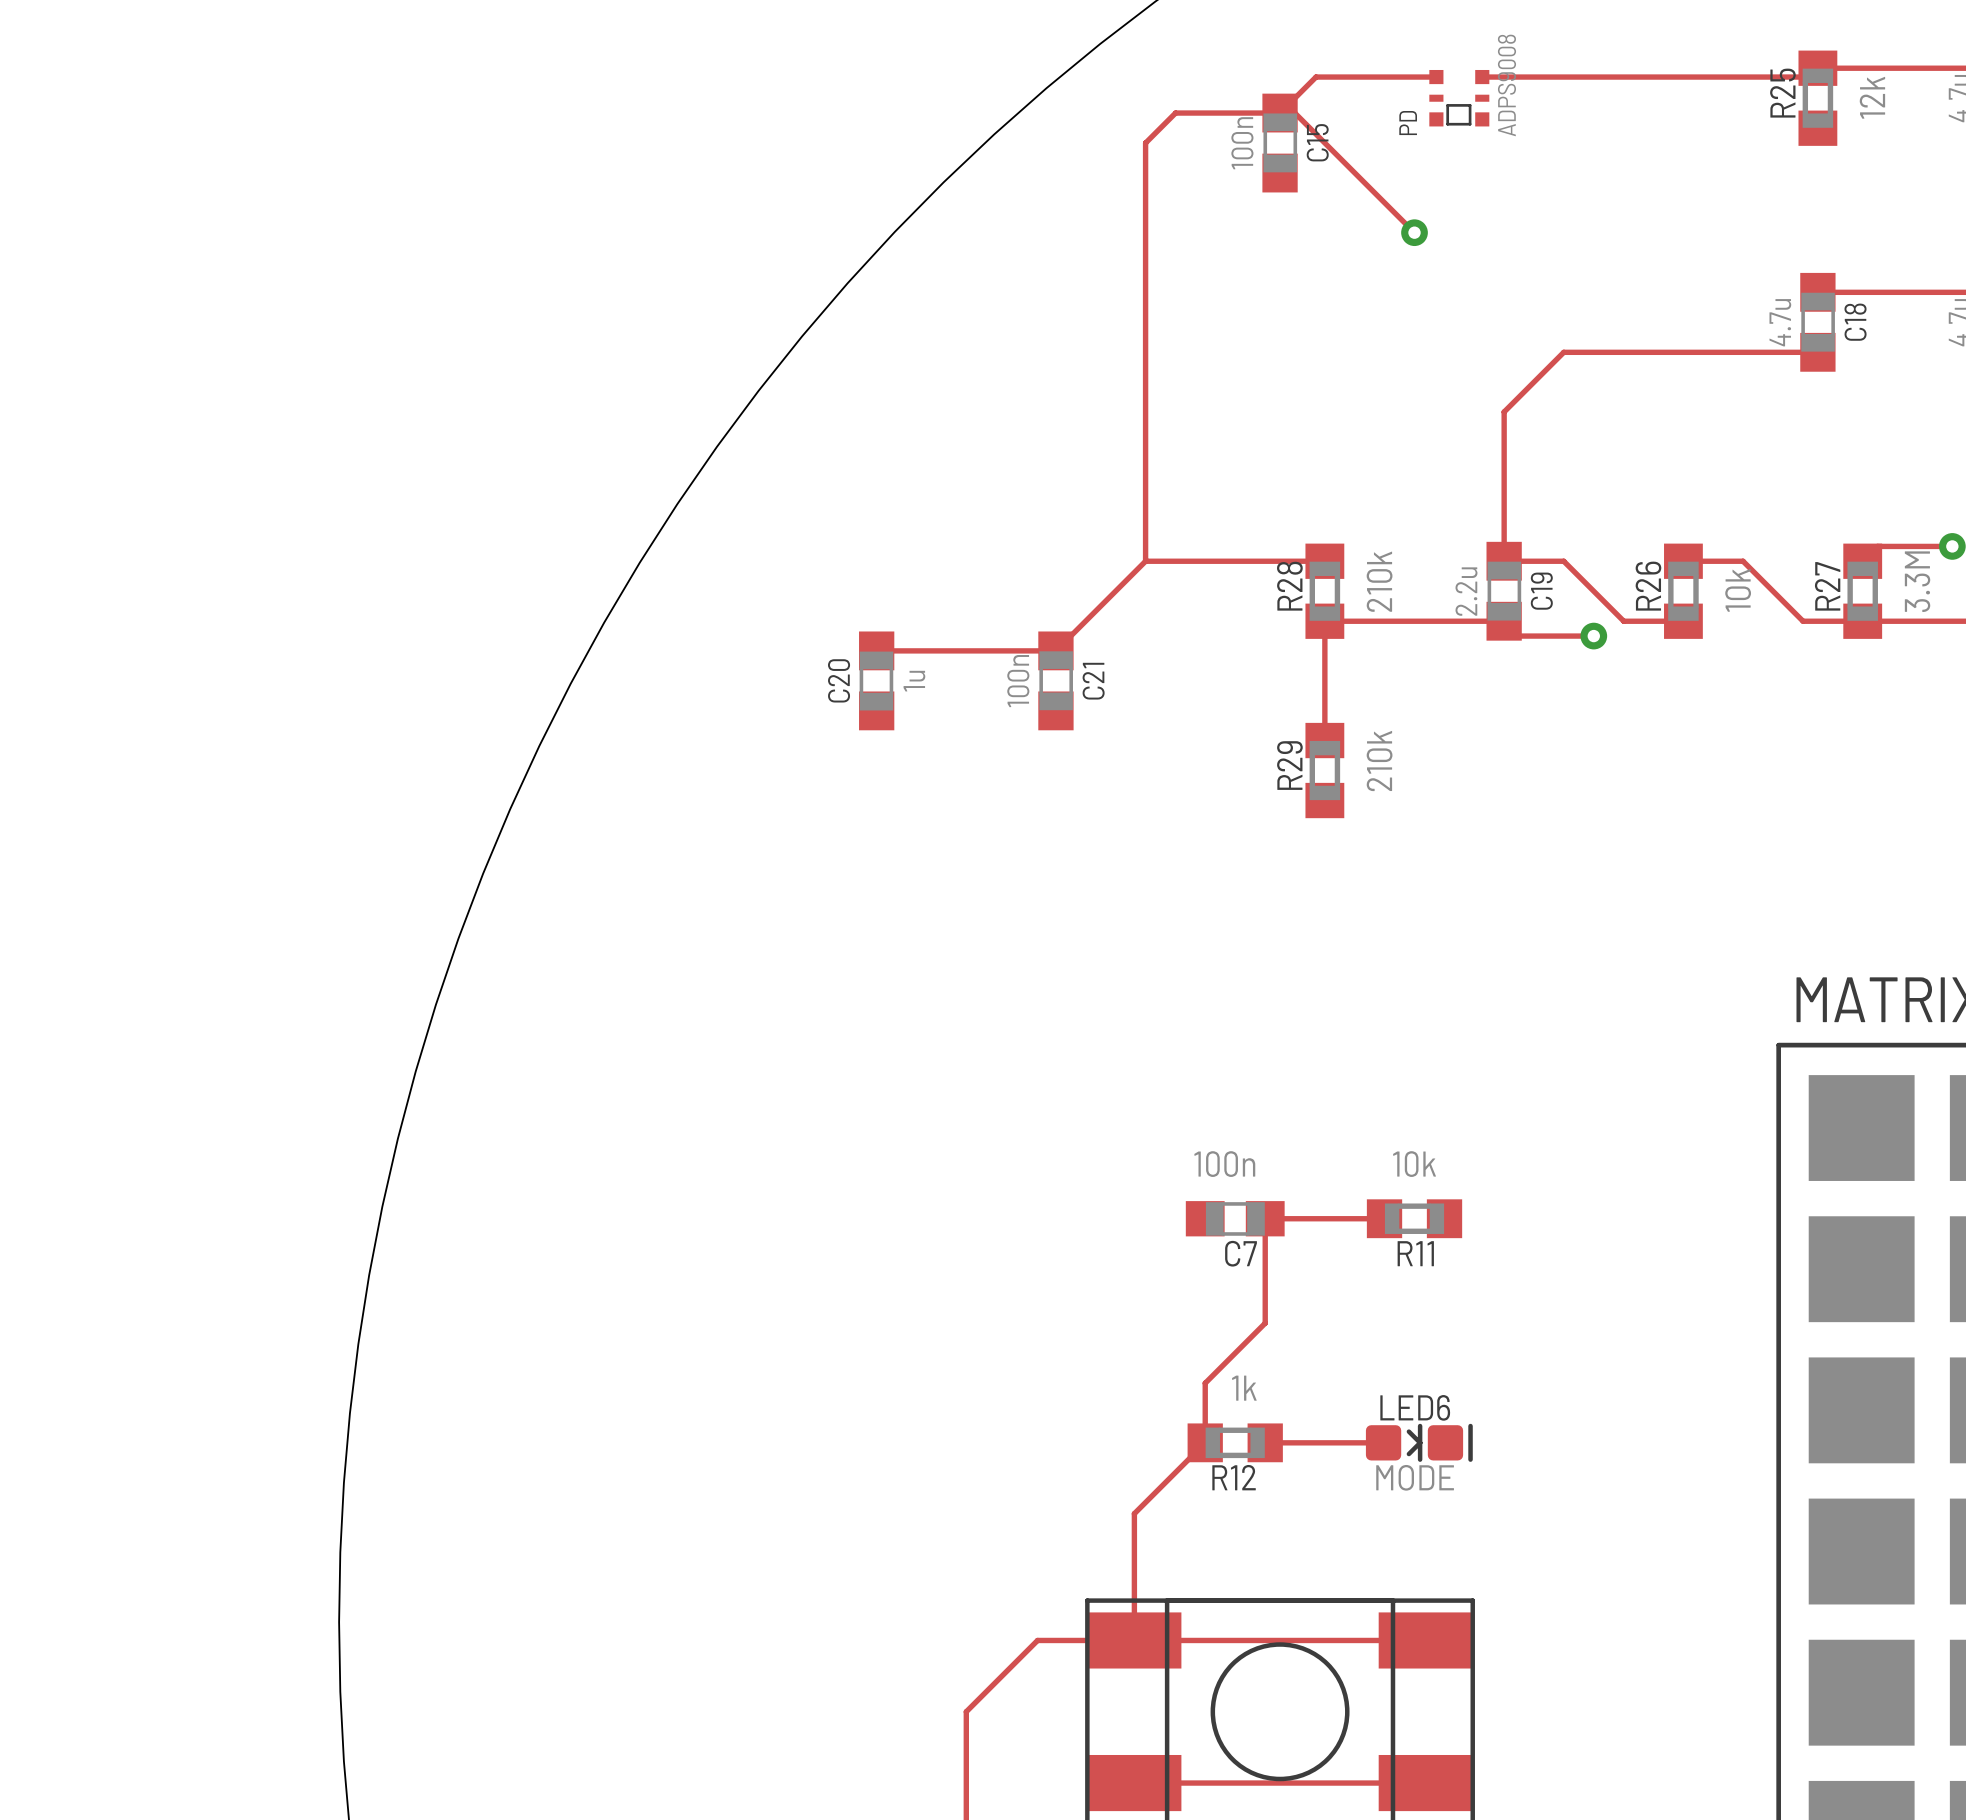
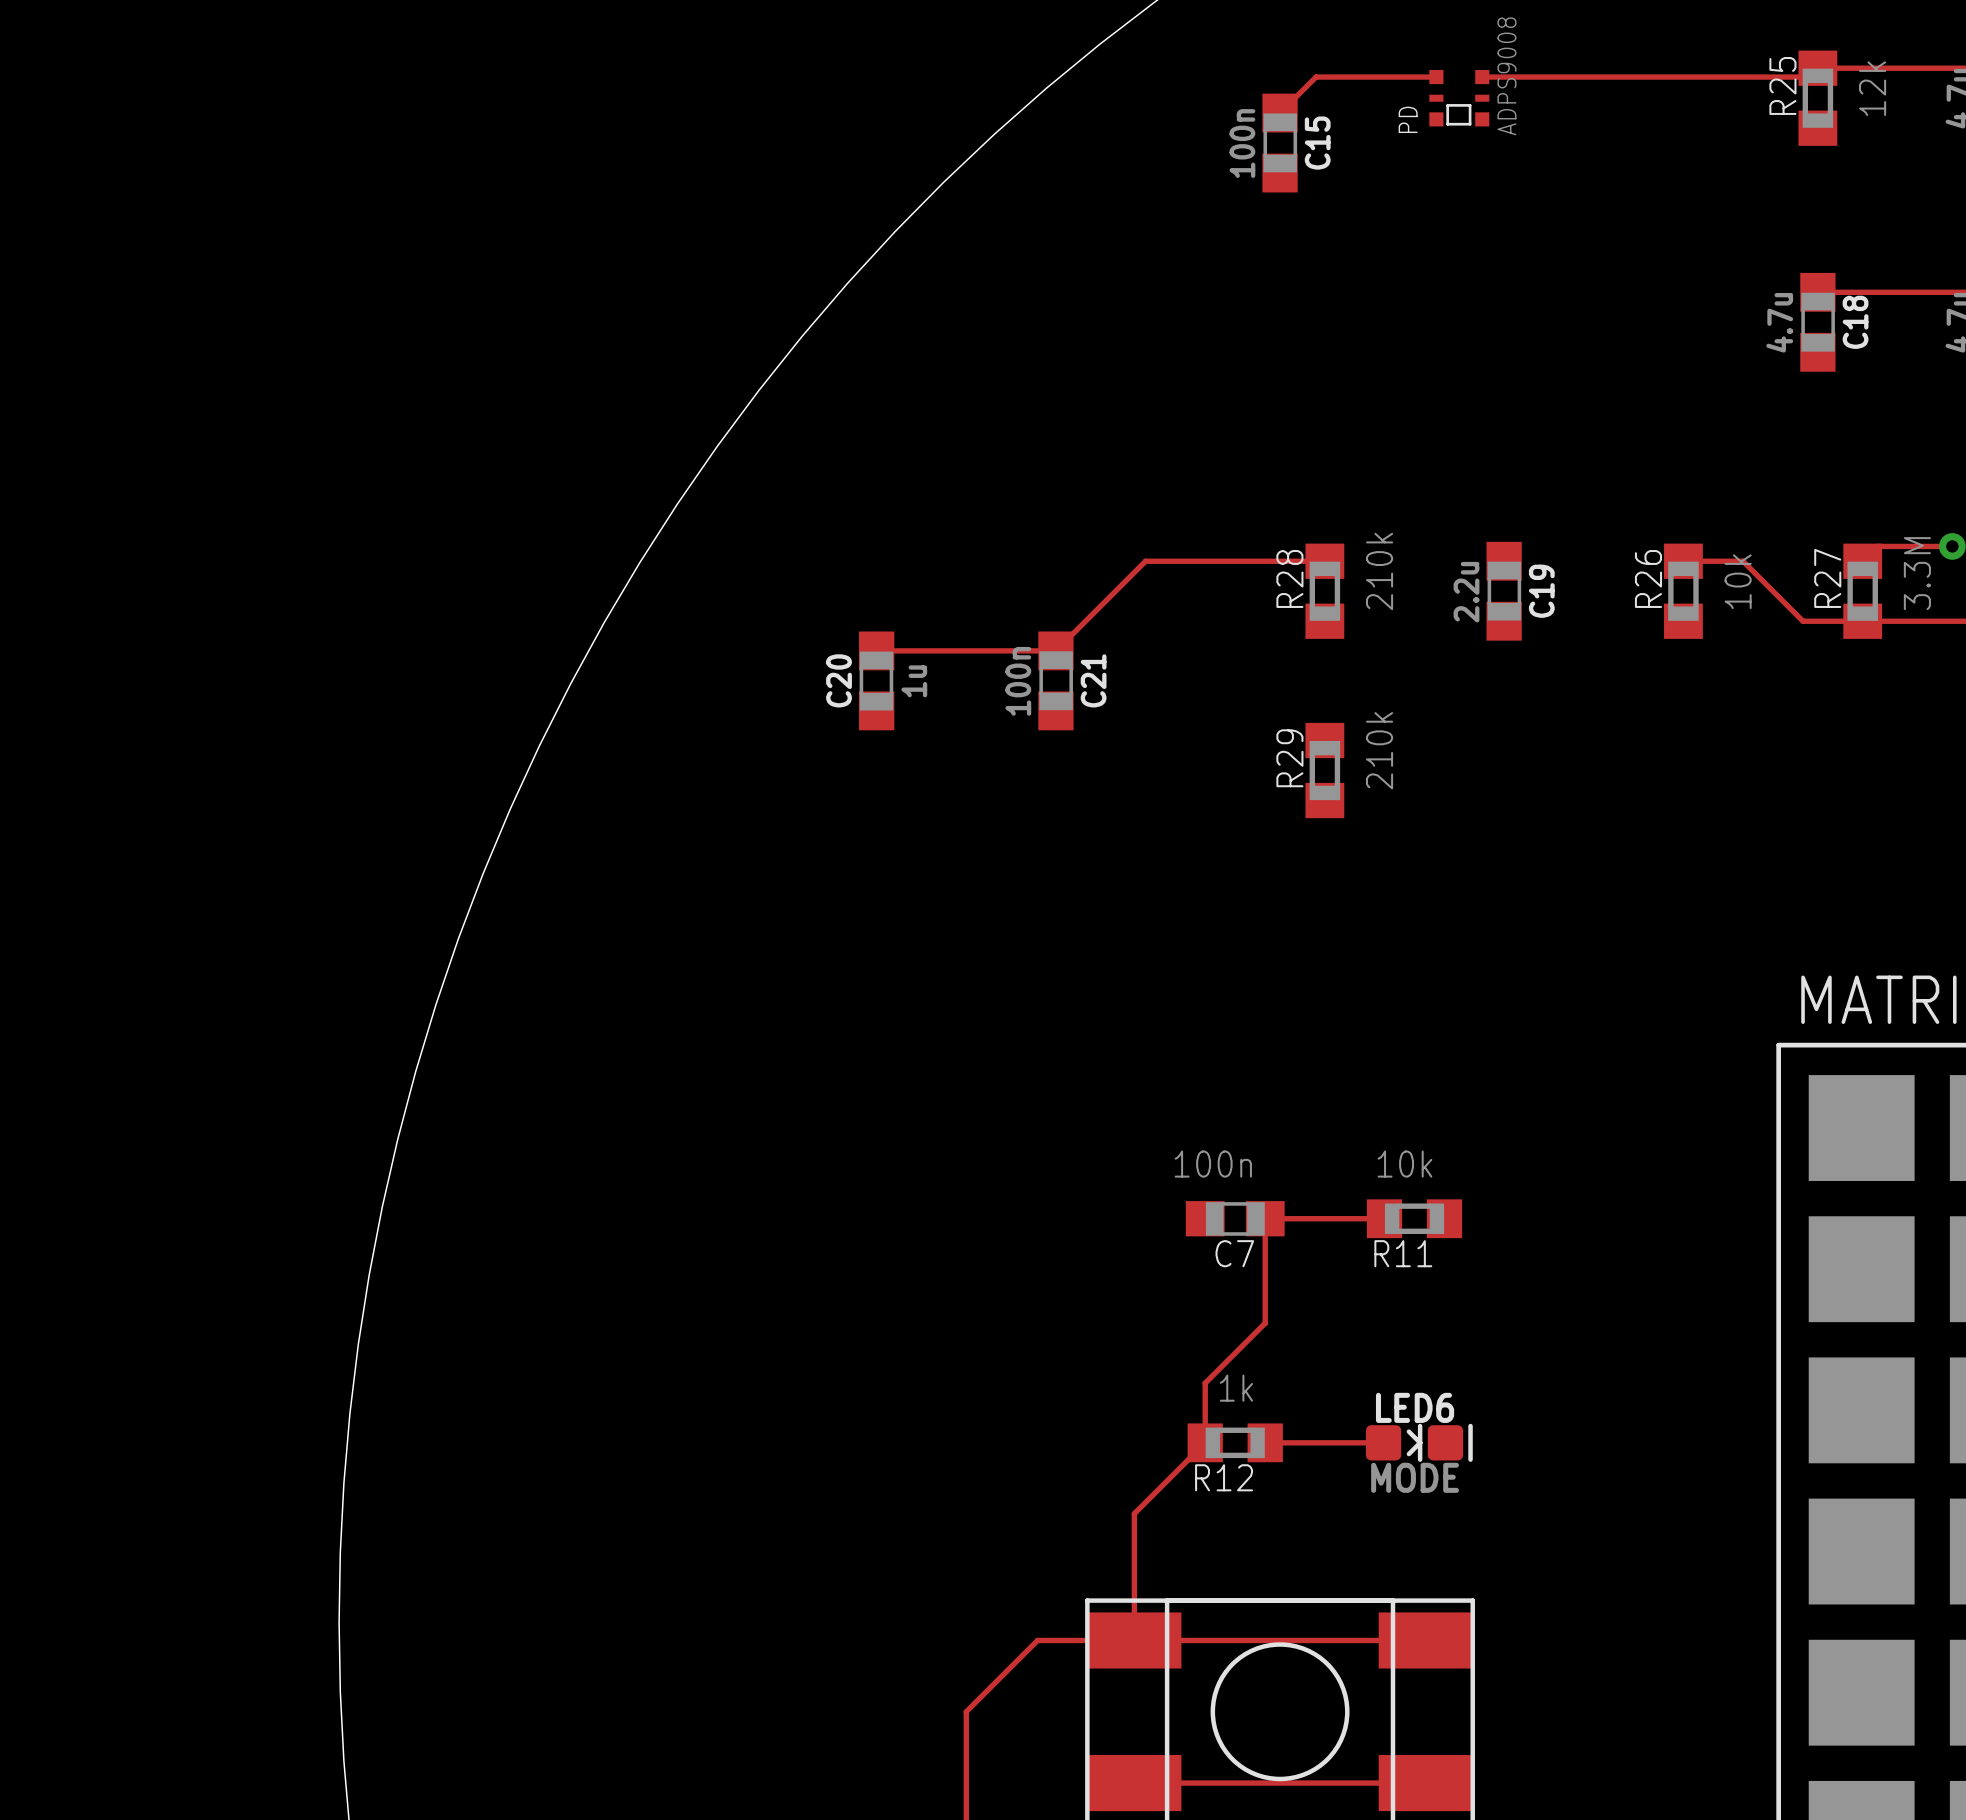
track: (1414, 232) (1294, 113) (1175, 113) (1145, 143) (1145, 561) -> none
via: (1414, 232) -> none
track: (1817, 352) (1563, 352) (1504, 411) (1504, 561) (1563, 561) (1623, 621) (1683, 621) -> none
track: (1593, 636) (1518, 636) (1504, 621) (1324, 621) (1324, 740) -> none
via: (1593, 636) -> none

